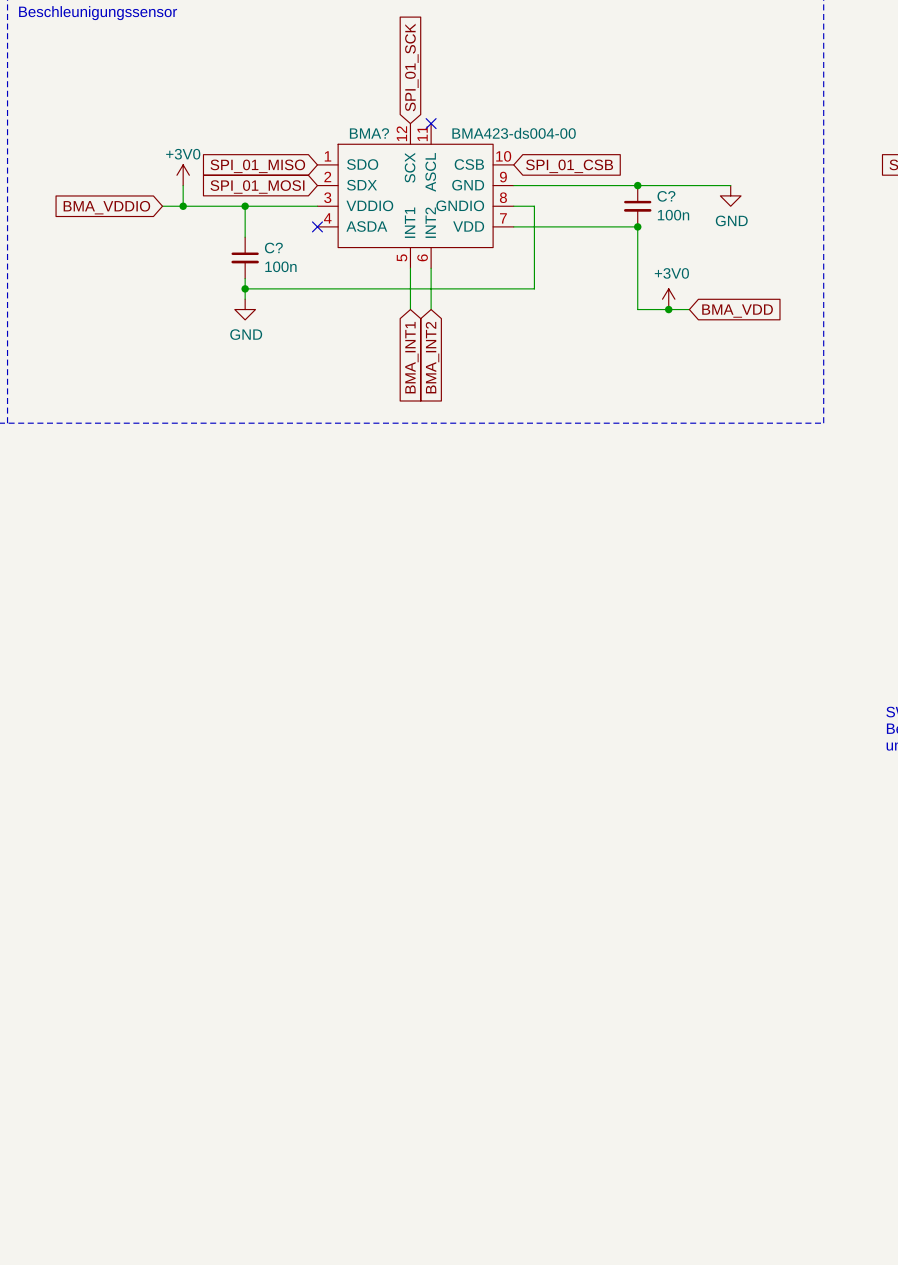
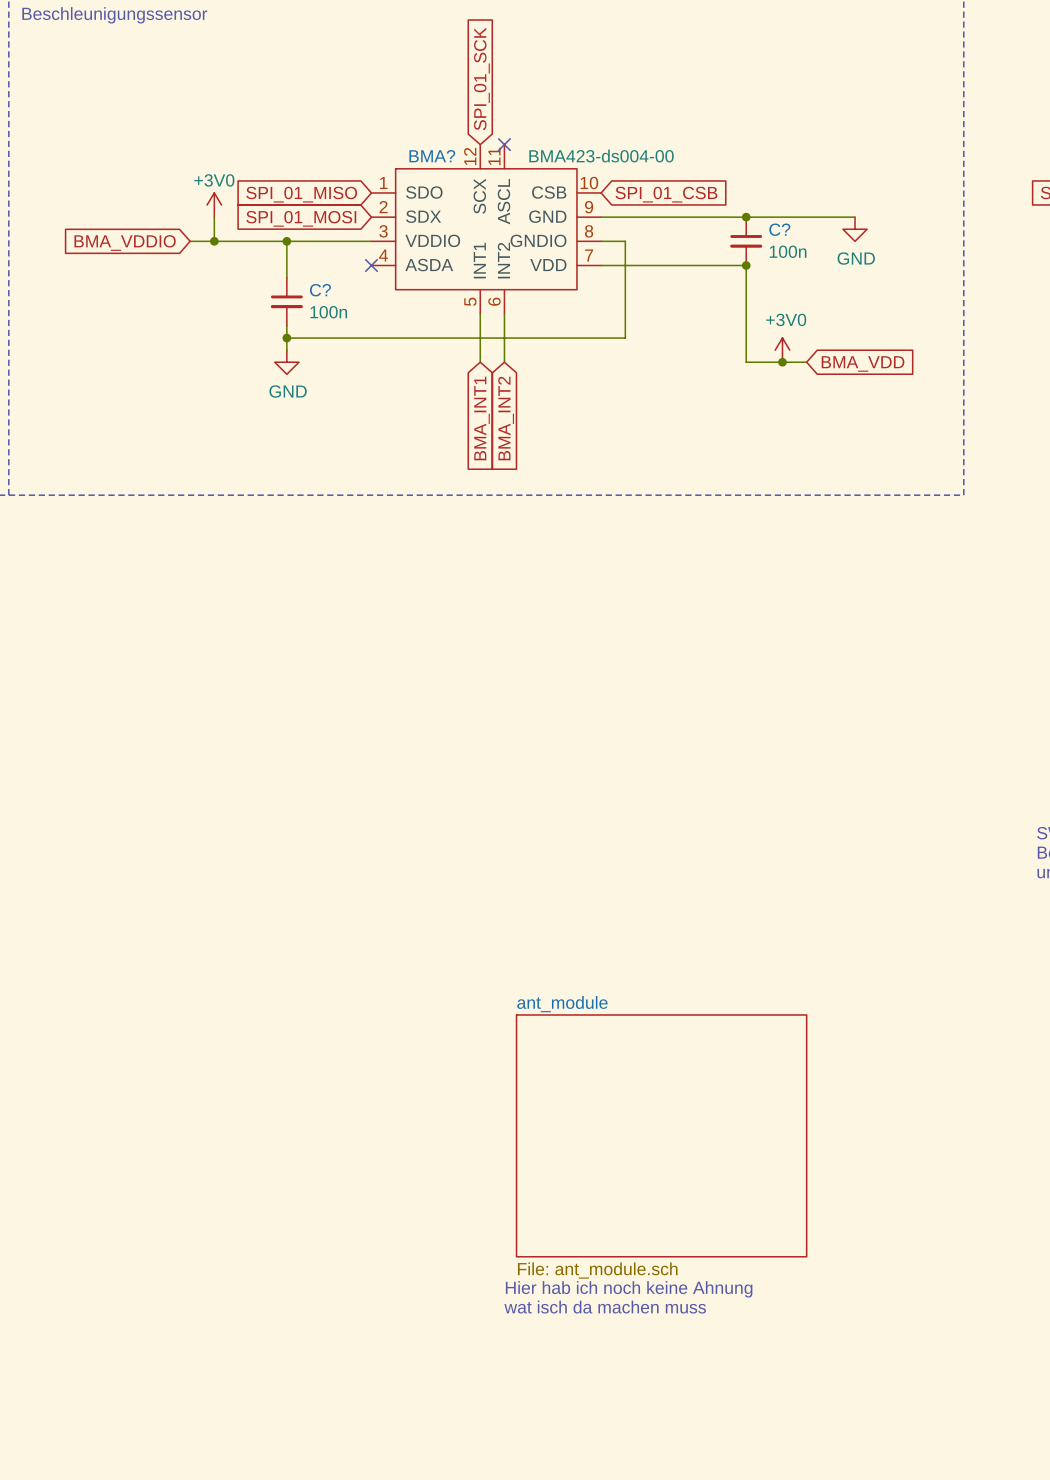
sheet ant_module: none -> File: ant_module.sch (661, 1135)
text: none -> Hier hab ich noch keine Ahnung (629, 1289)
text: none -> wat isch da machen muss (605, 1307)

